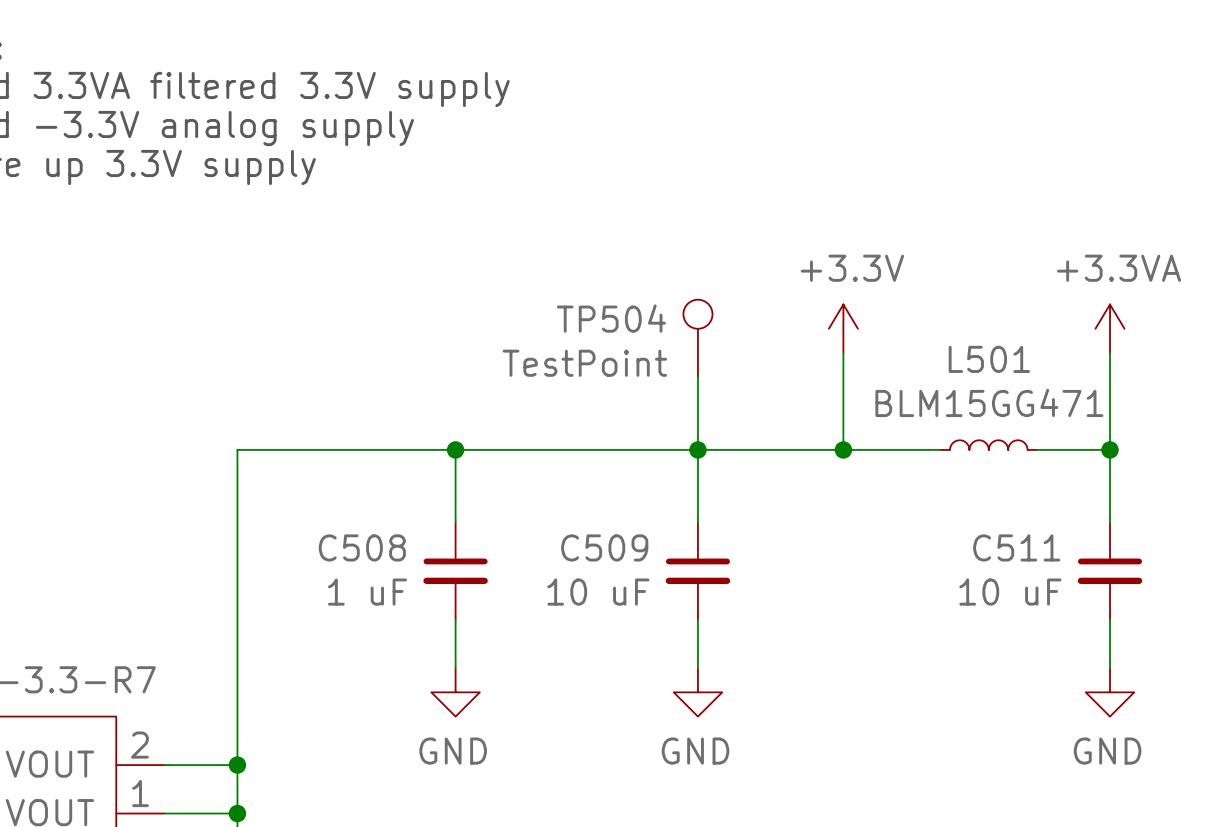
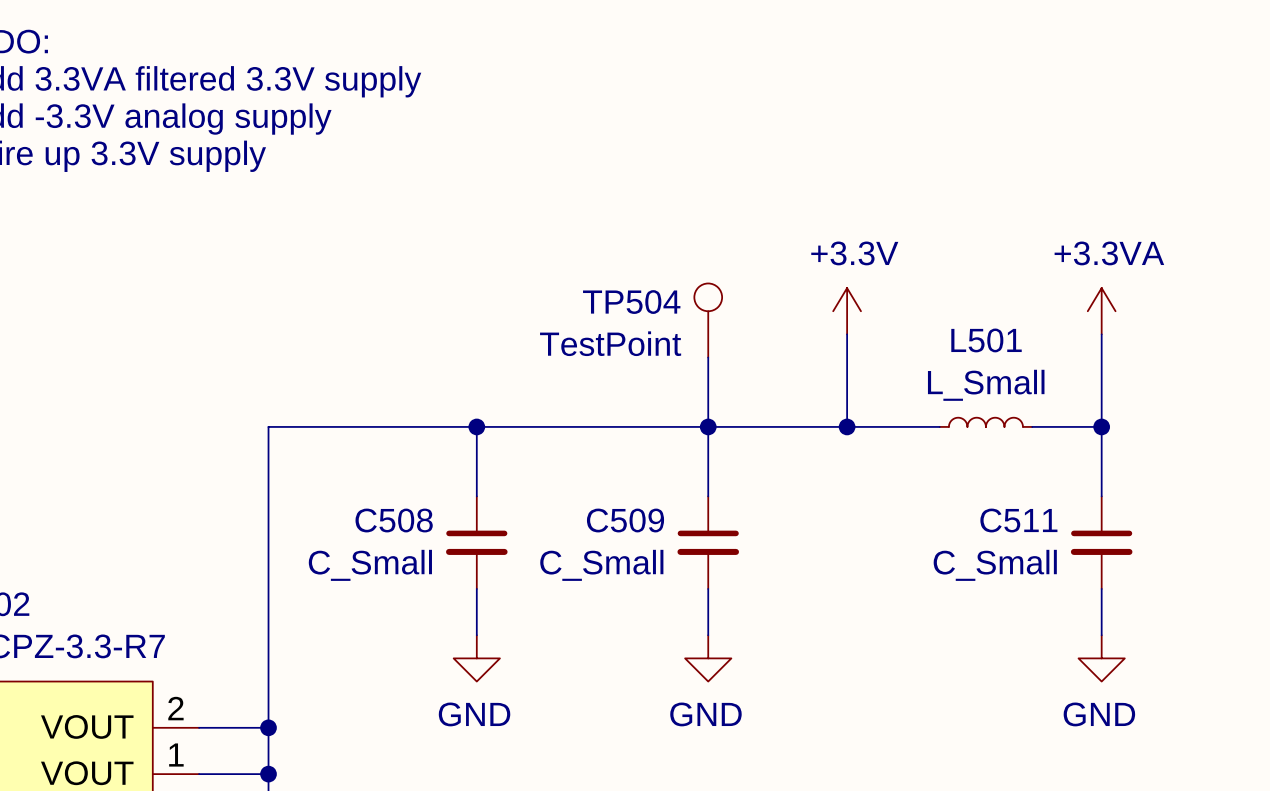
L501 value: BLM15GG471 (989, 402) -> L_Small (986, 385)
C508 value: 1 uF (367, 592) -> C_Small (370, 565)
C509 value: 10 uF (598, 592) -> C_Small (601, 565)
C511 value: 10 uF (1010, 592) -> C_Small (995, 565)

